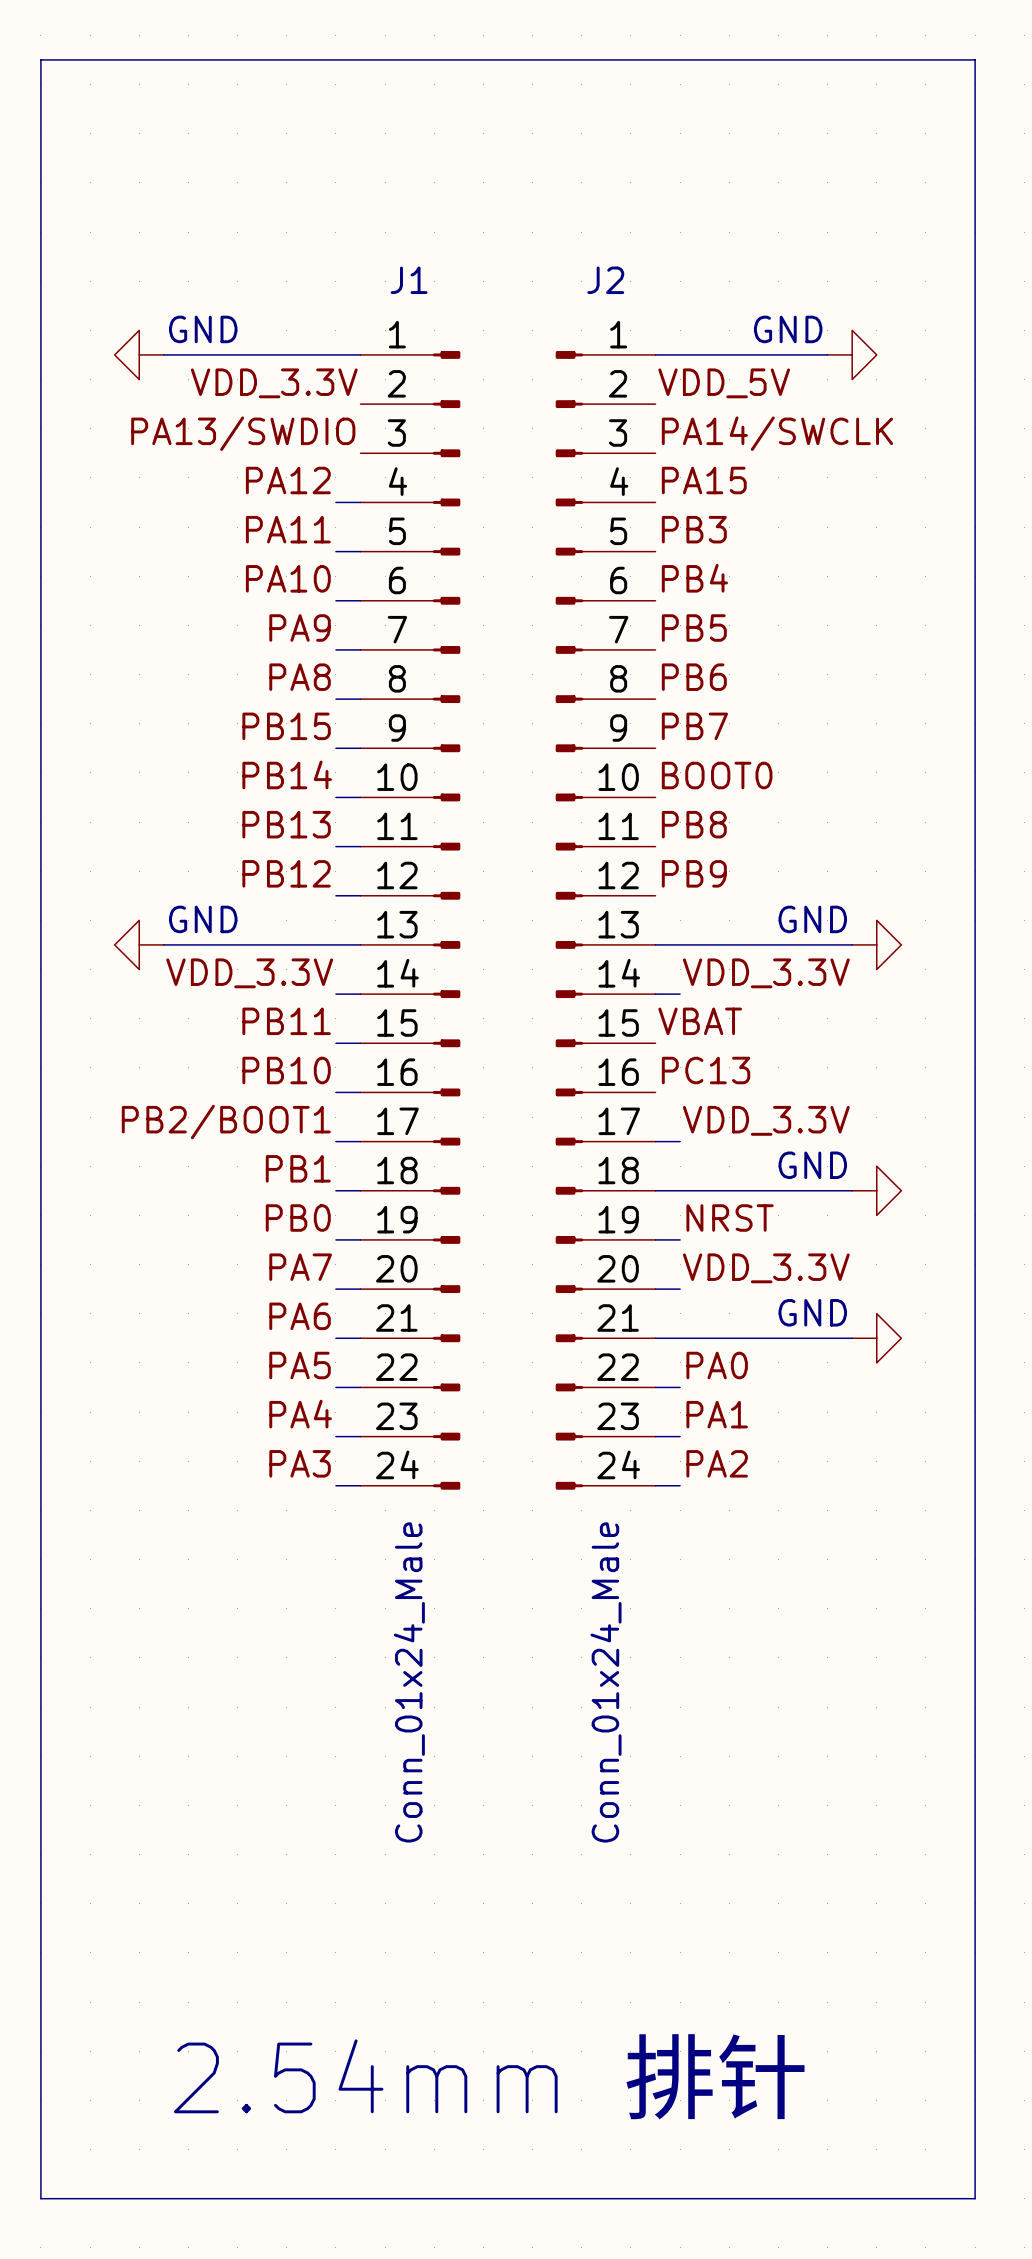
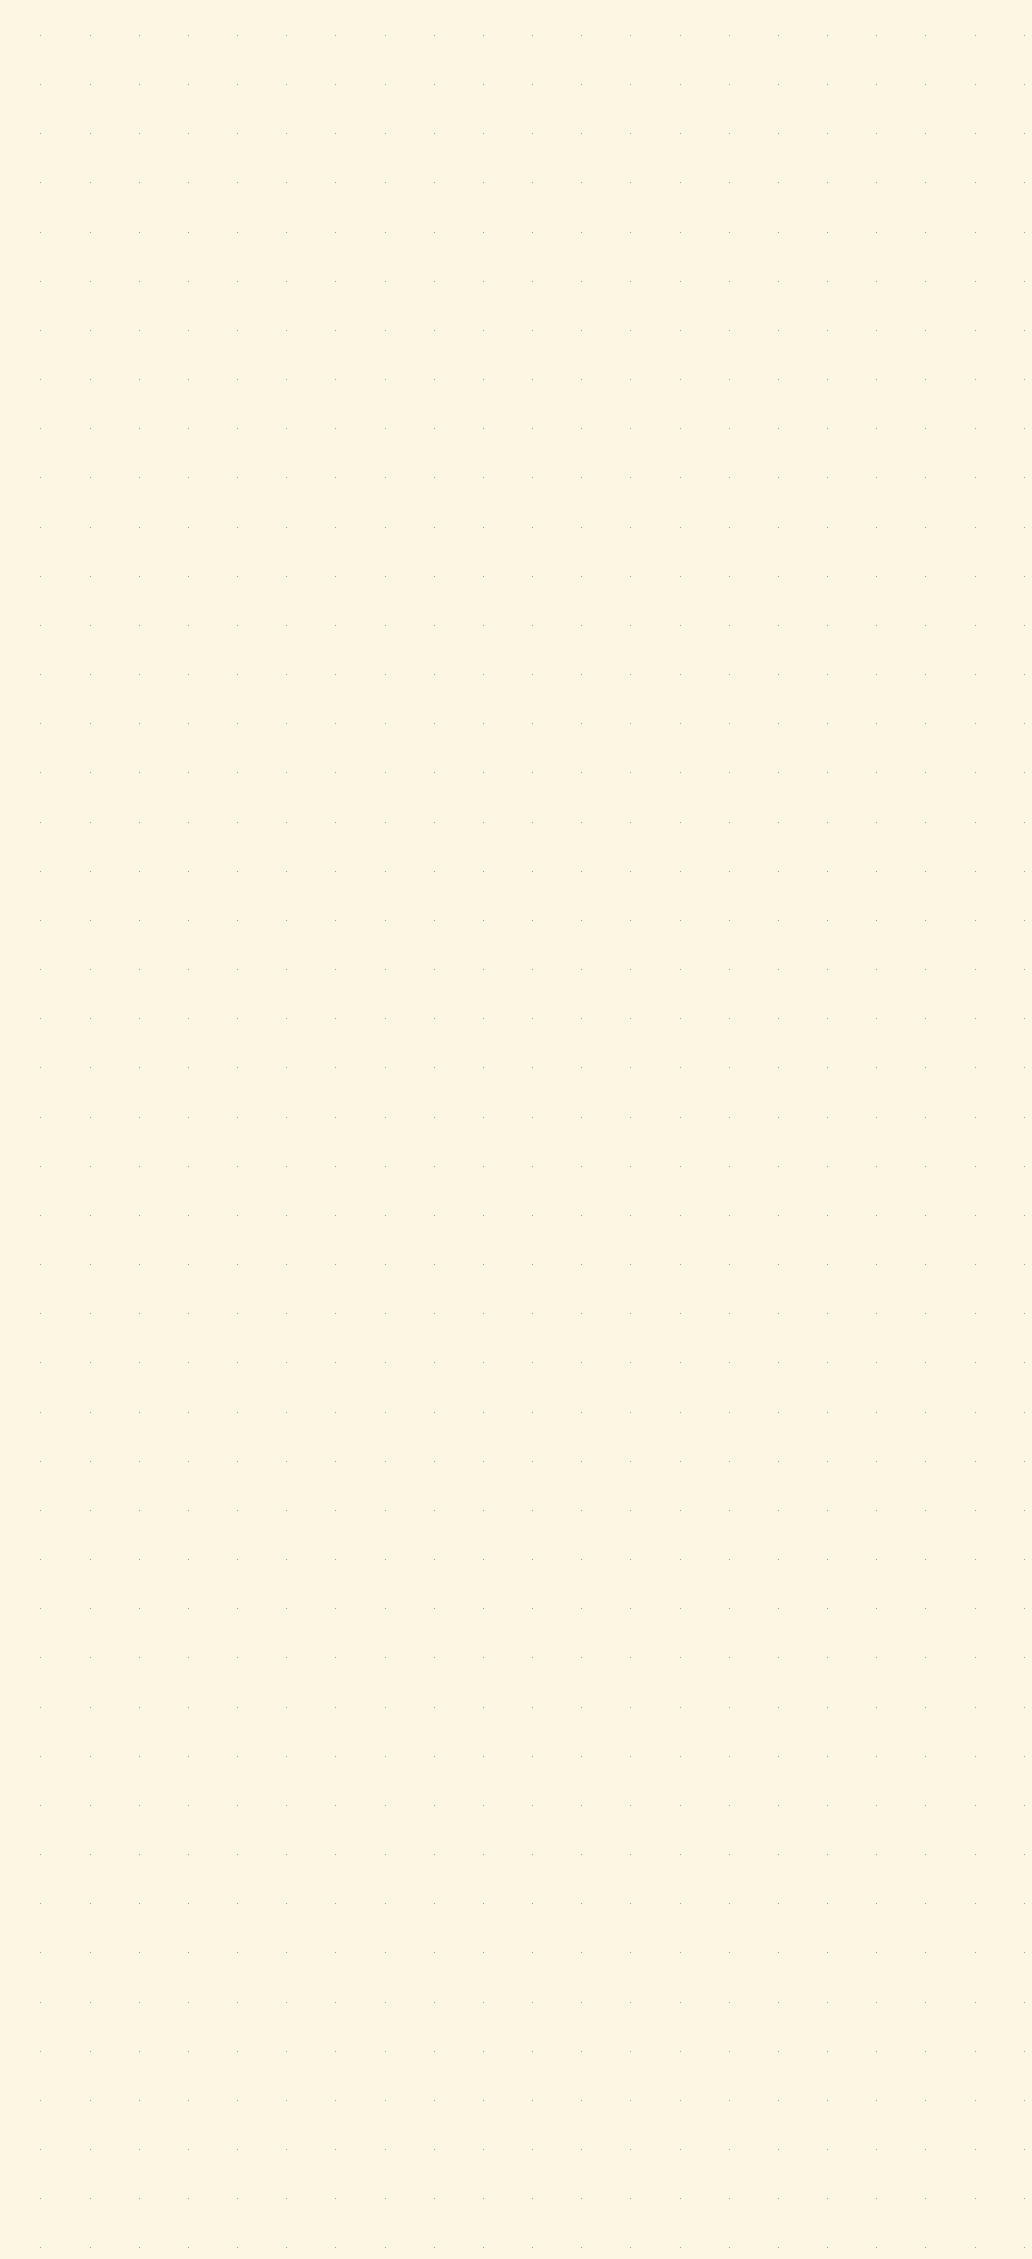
line: (40, 59) (40, 2198) (975, 2198) (975, 59) (40, 59) -> none
power symbol: GND (139, 354) -> none
wire: (163, 354) (360, 354) -> none
wire: (655, 354) (827, 354) -> none
power symbol: GND (852, 354) -> none
label: VDD_3.3V (274, 383) -> none
label: VDD_5V (724, 383) -> none
label: PA13/SWDIO (243, 433) -> none
label: PA14/SWCLK (777, 433) -> none
label: PA12 (288, 480) -> none
label: PA15 (704, 480) -> none
wire: (335, 502) (360, 502) -> none
label: PA11 (288, 529) -> none
label: PB3 (694, 529) -> none
wire: (335, 551) (360, 551) -> none
label: PA10 (288, 578) -> none
label: PB4 (694, 578) -> none
wire: (335, 600) (360, 600) -> none
label: PA9 (300, 628) -> none
label: PB5 (694, 628) -> none
wire: (335, 649) (360, 649) -> none
label: PA8 (300, 677) -> none
label: PB6 (694, 677) -> none
wire: (335, 699) (360, 699) -> none
label: PB15 (286, 726) -> none
label: PB7 (694, 726) -> none
wire: (335, 748) (360, 748) -> none
label: PB14 (287, 774) -> none
label: BOOT0 (717, 775) -> none
wire: (335, 797) (360, 797) -> none
label: PB13 (286, 824) -> none
label: PB8 (694, 824) -> none
wire: (335, 846) (360, 846) -> none
label: PB12 (286, 873) -> none
label: PB9 (694, 873) -> none
wire: (335, 895) (360, 895) -> none
J1: Conn_01x24_Male (410, 920) -> none
J2: Conn_01x24_Male (605, 920) -> none
power symbol: GND (139, 944) -> none
wire: (163, 944) (360, 944) -> none
wire: (655, 944) (852, 944) -> none
power symbol: GND (876, 944) -> none
label: VDD_3.3V (249, 973) -> none
label: VDD_3.3V (766, 973) -> none
wire: (335, 994) (360, 994) -> none
wire: (655, 994) (680, 994) -> none
label: PB11 (286, 1021) -> none
label: VBAT (700, 1021) -> none
wire: (335, 1043) (360, 1043) -> none
label: PB10 (286, 1070) -> none
label: PC13 (706, 1070) -> none
wire: (335, 1092) (360, 1092) -> none
label: VDD_3.3V (766, 1120) -> none
label: PB2/BOOT1 (226, 1122) -> none
wire: (335, 1141) (360, 1141) -> none
wire: (655, 1141) (680, 1141) -> none
label: PB1 (298, 1168) -> none
wire: (335, 1190) (360, 1190) -> none
wire: (655, 1190) (852, 1190) -> none
power symbol: GND (876, 1190) -> none
label: PB0 (298, 1218) -> none
label: NRST (730, 1218) -> none
wire: (335, 1239) (360, 1239) -> none
wire: (655, 1239) (680, 1239) -> none
label: PA7 (300, 1267) -> none
label: VDD_3.3V (766, 1268) -> none
wire: (335, 1289) (360, 1289) -> none
wire: (655, 1289) (680, 1289) -> none
label: PA6 (300, 1316) -> none
wire: (335, 1338) (360, 1338) -> none
wire: (655, 1338) (852, 1338) -> none
power symbol: GND (876, 1338) -> none
label: PA5 (300, 1365) -> none
label: PA0 (717, 1365) -> none
wire: (335, 1387) (360, 1387) -> none
wire: (655, 1387) (680, 1387) -> none
label: PA4 (300, 1414) -> none
label: PA1 (717, 1414) -> none
wire: (335, 1436) (360, 1436) -> none
wire: (655, 1436) (680, 1436) -> none
label: PA3 (300, 1463) -> none
label: PA2 (717, 1463) -> none
wire: (335, 1485) (360, 1485) -> none
wire: (655, 1485) (680, 1485) -> none
text: 2.54mm 排针 (489, 2076) -> none

